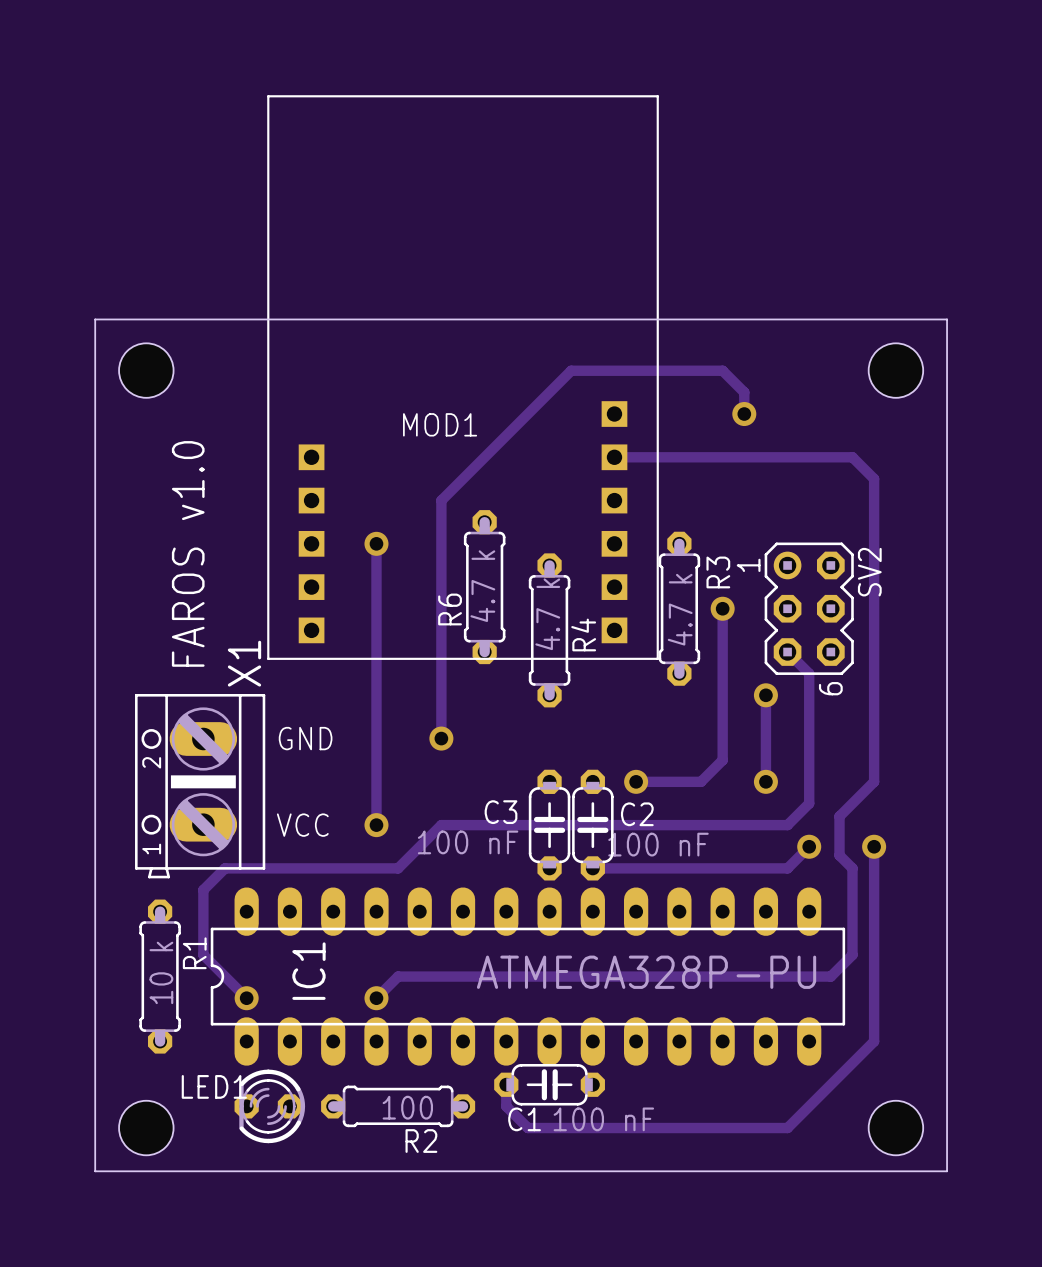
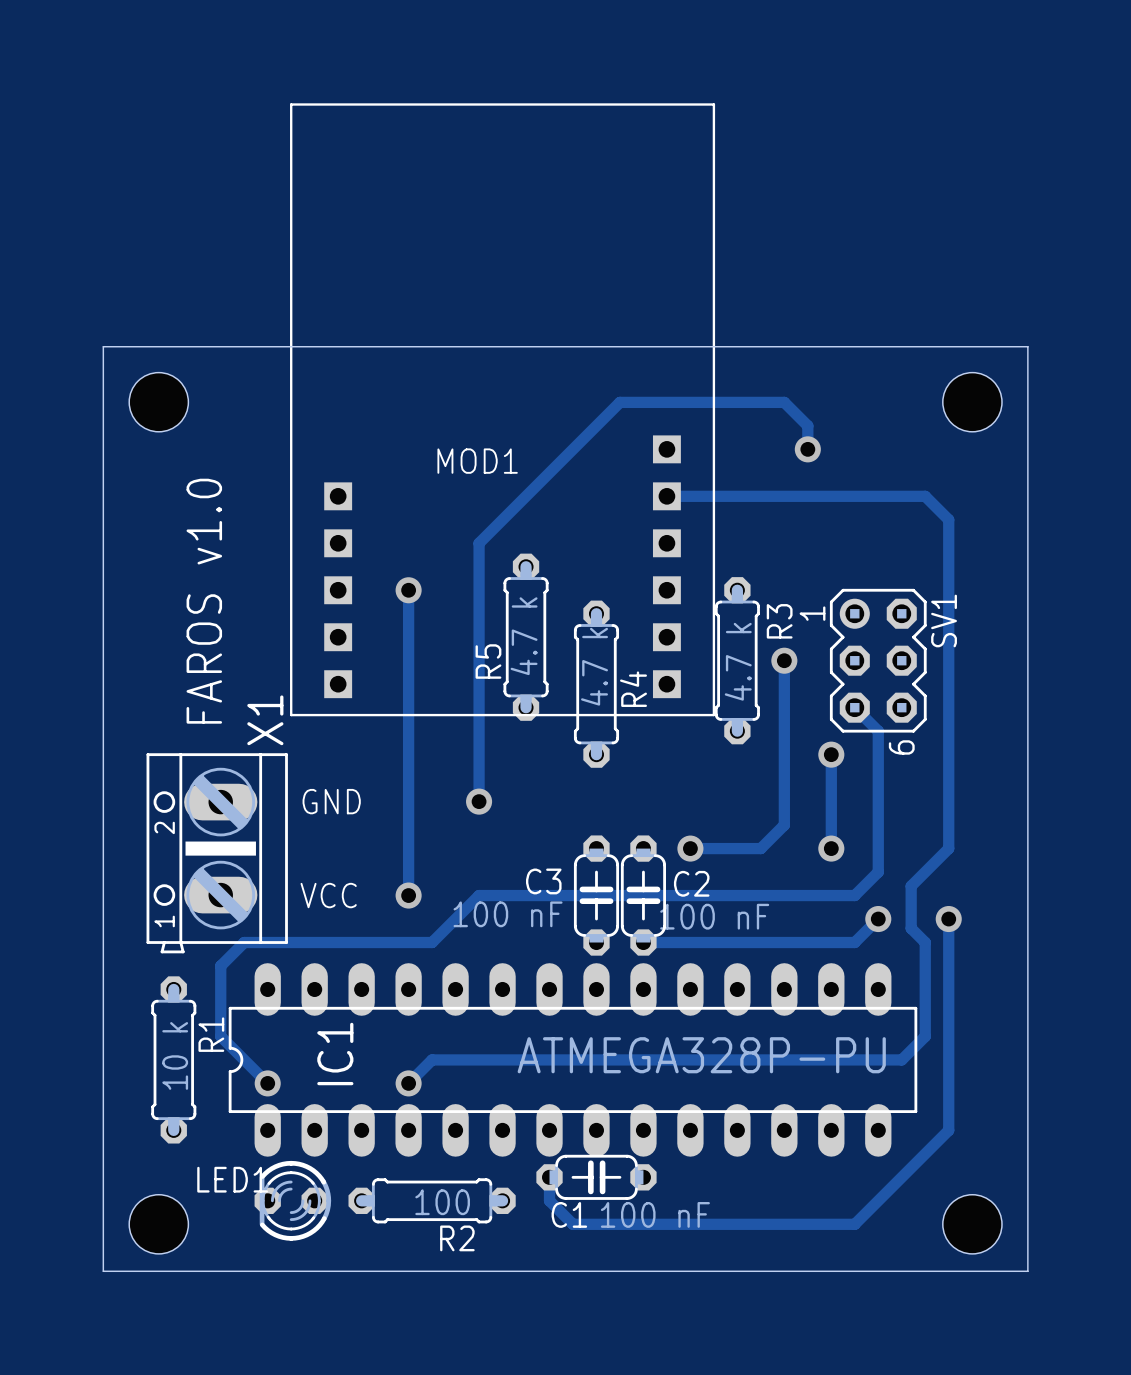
SV2 name: SV2 (869, 572) -> SV1 (944, 620)
R6 name: R6 (450, 609) -> R5 (488, 661)

